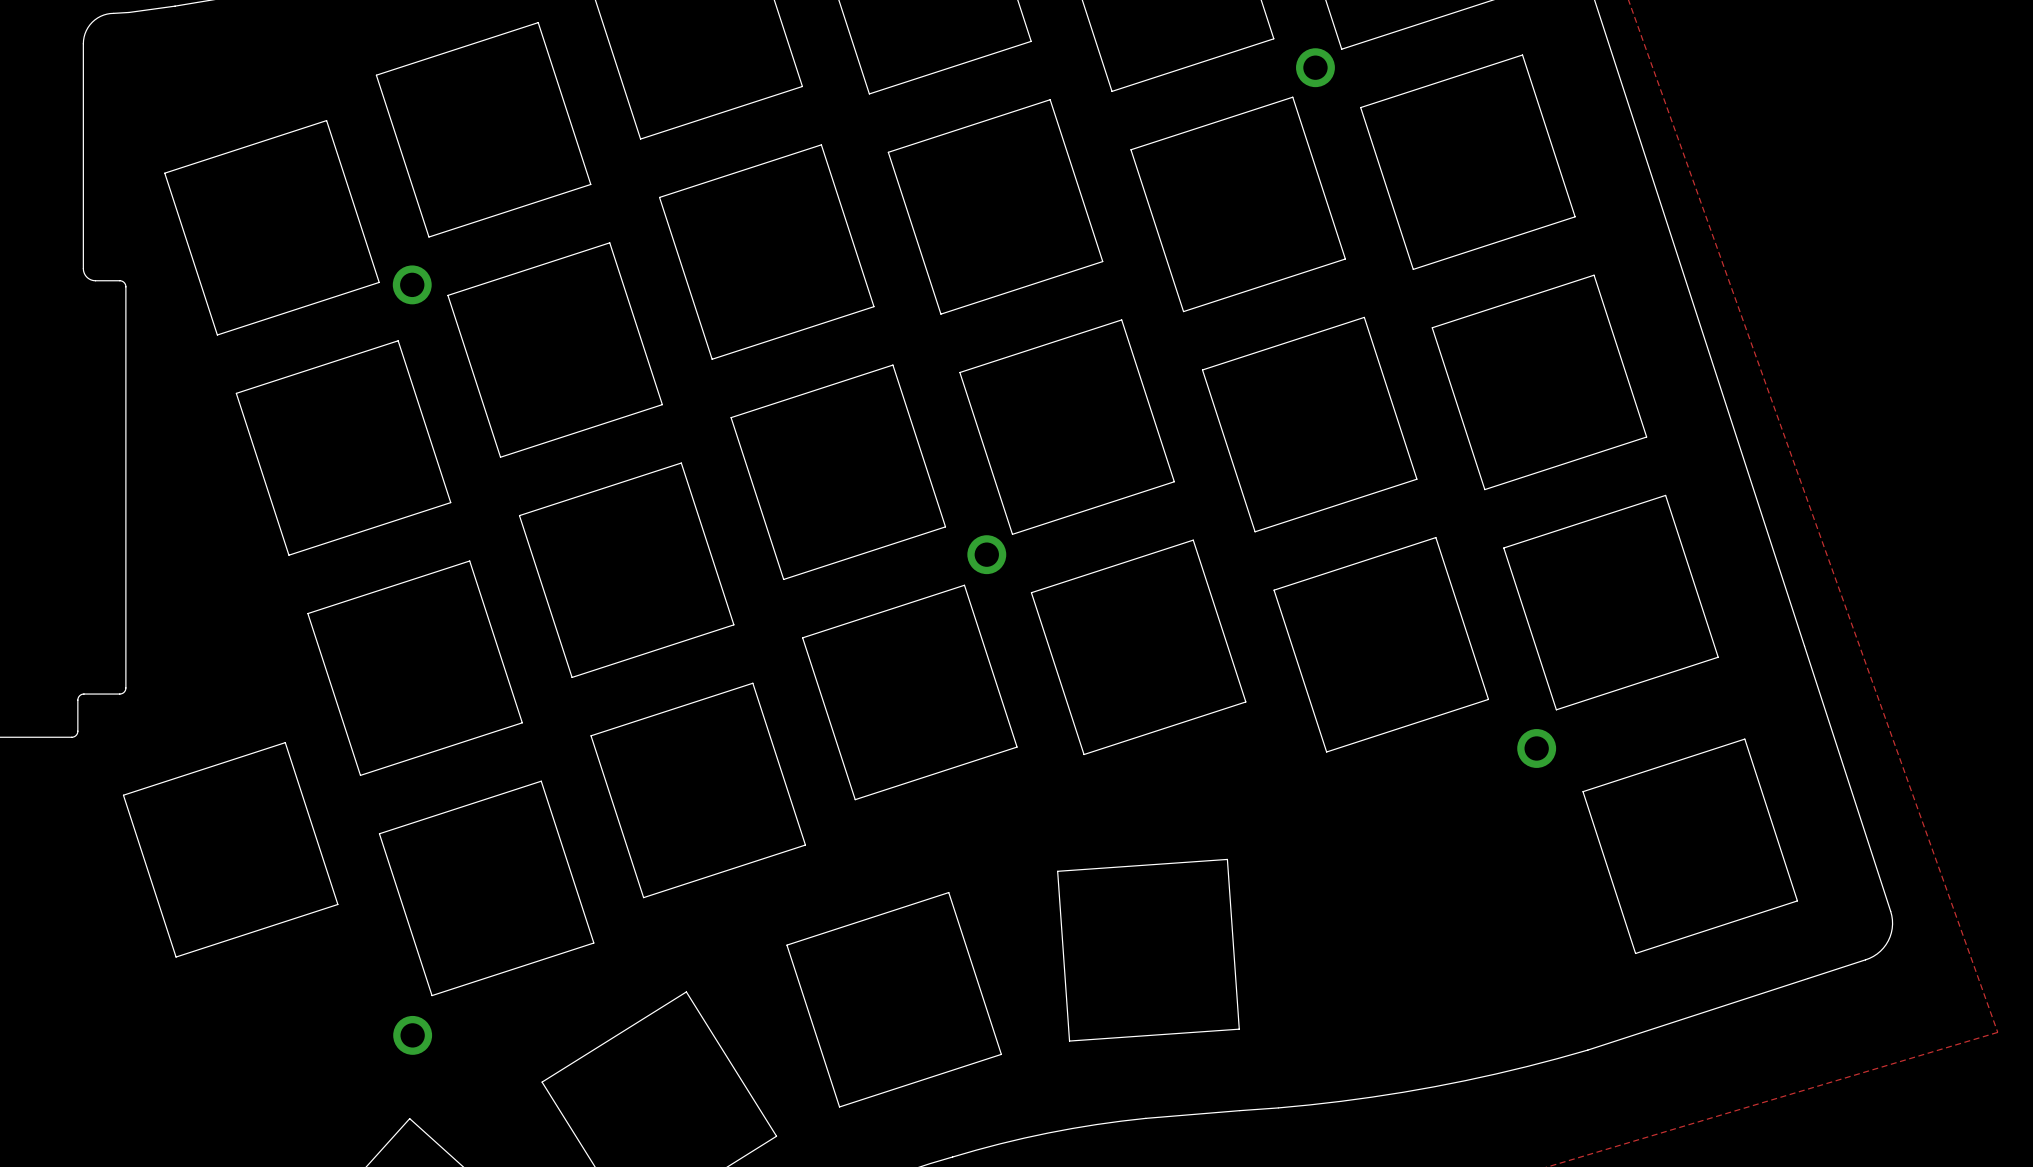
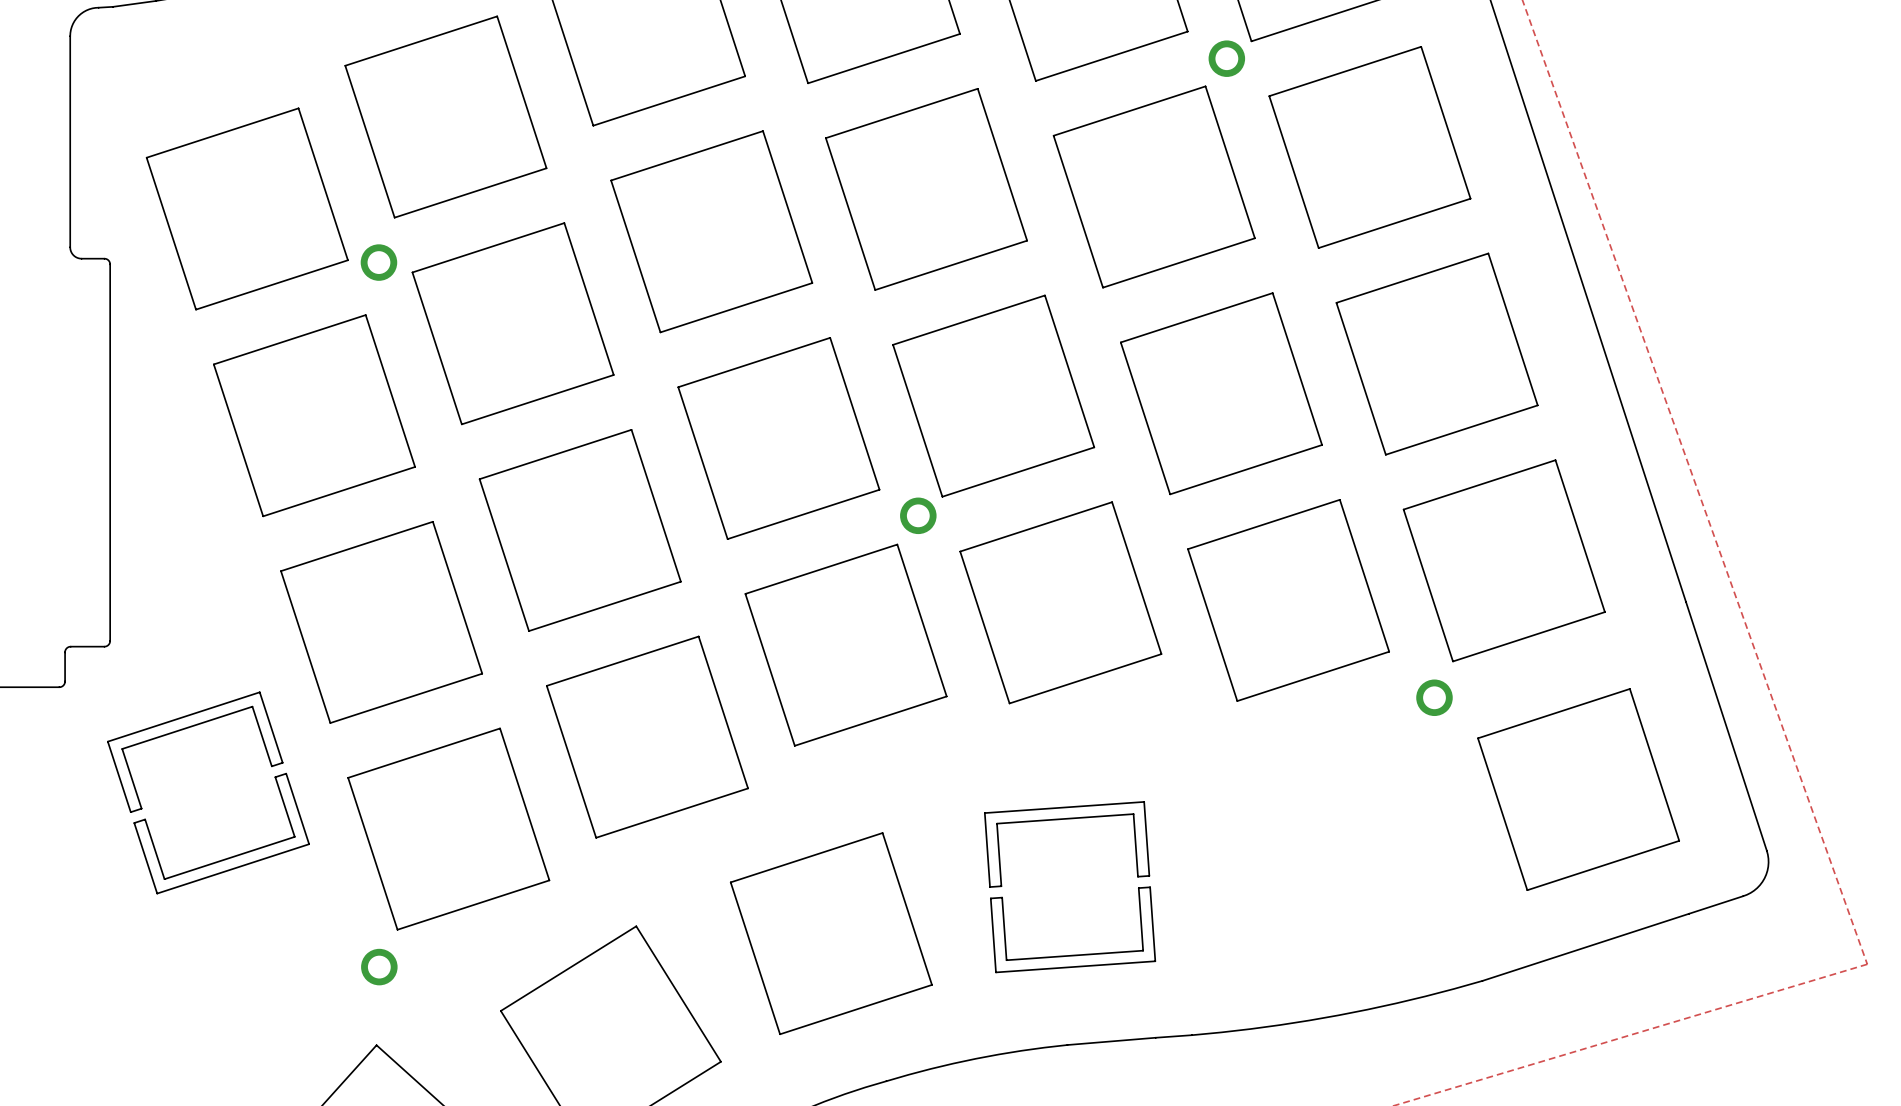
board edge: (309, 817) (313, 829) -> (134, 823) (145, 819) (164, 879) (294, 836) (275, 777) (286, 773)
board edge: (147, 870) (151, 881) -> (130, 812) (141, 808) (122, 748) (252, 706) (271, 766) (282, 762)
board edge: (1232, 938) (1233, 950) -> (990, 898) (1002, 897) (1006, 960) (1143, 950) (1138, 888) (1150, 887)
board edge: (1063, 950) (1064, 962) -> (990, 887) (1001, 886) (997, 823) (1133, 814) (1137, 876) (1149, 875)

